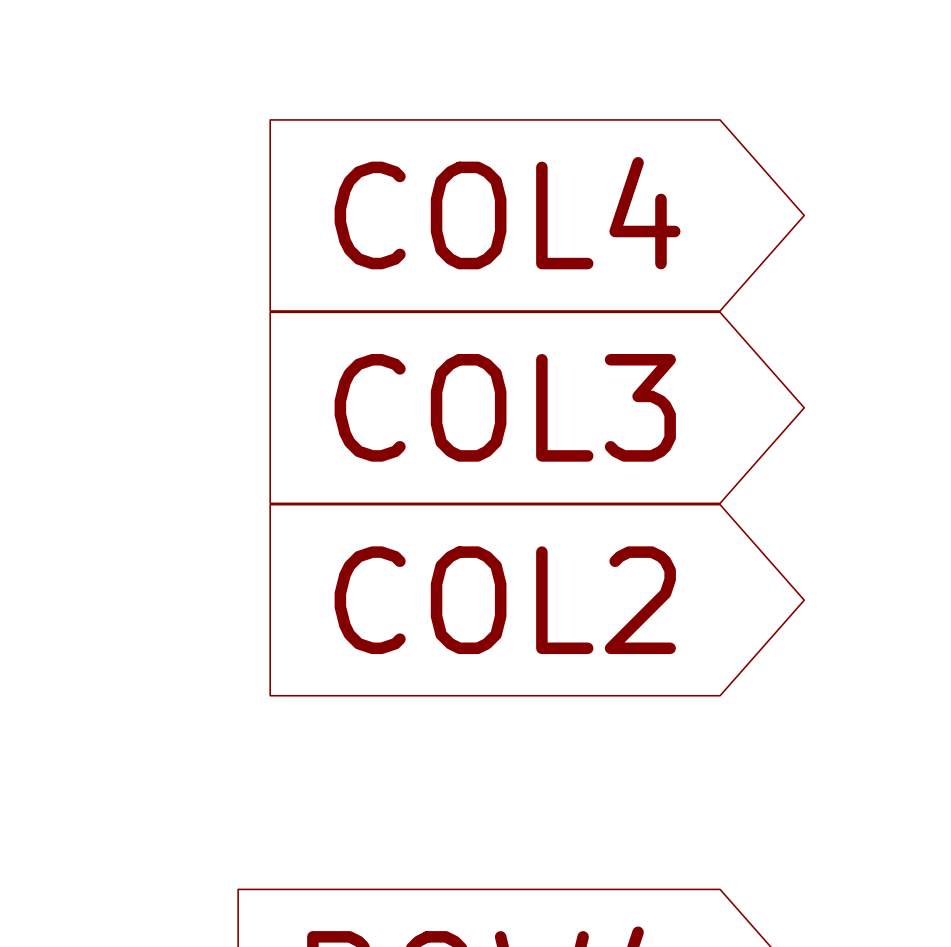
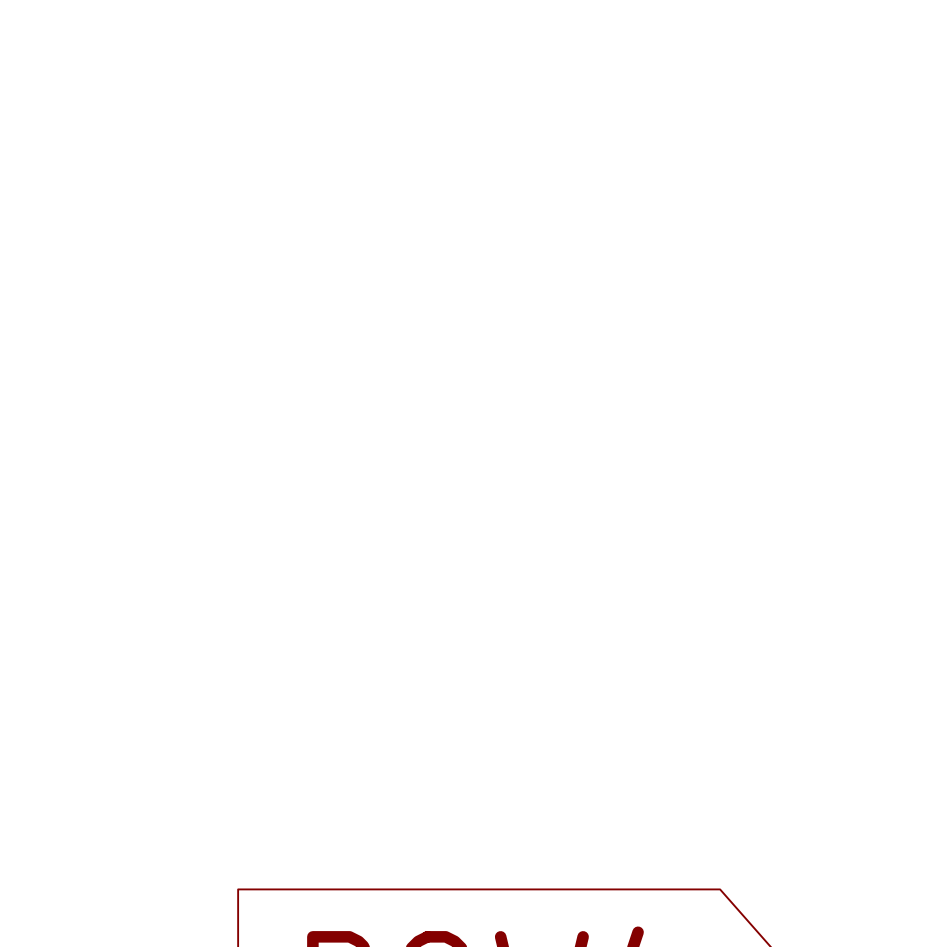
global label: COL4 (507, 213) -> none
global label: COL3 (505, 407) -> none
global label: COL2 (505, 600) -> none

